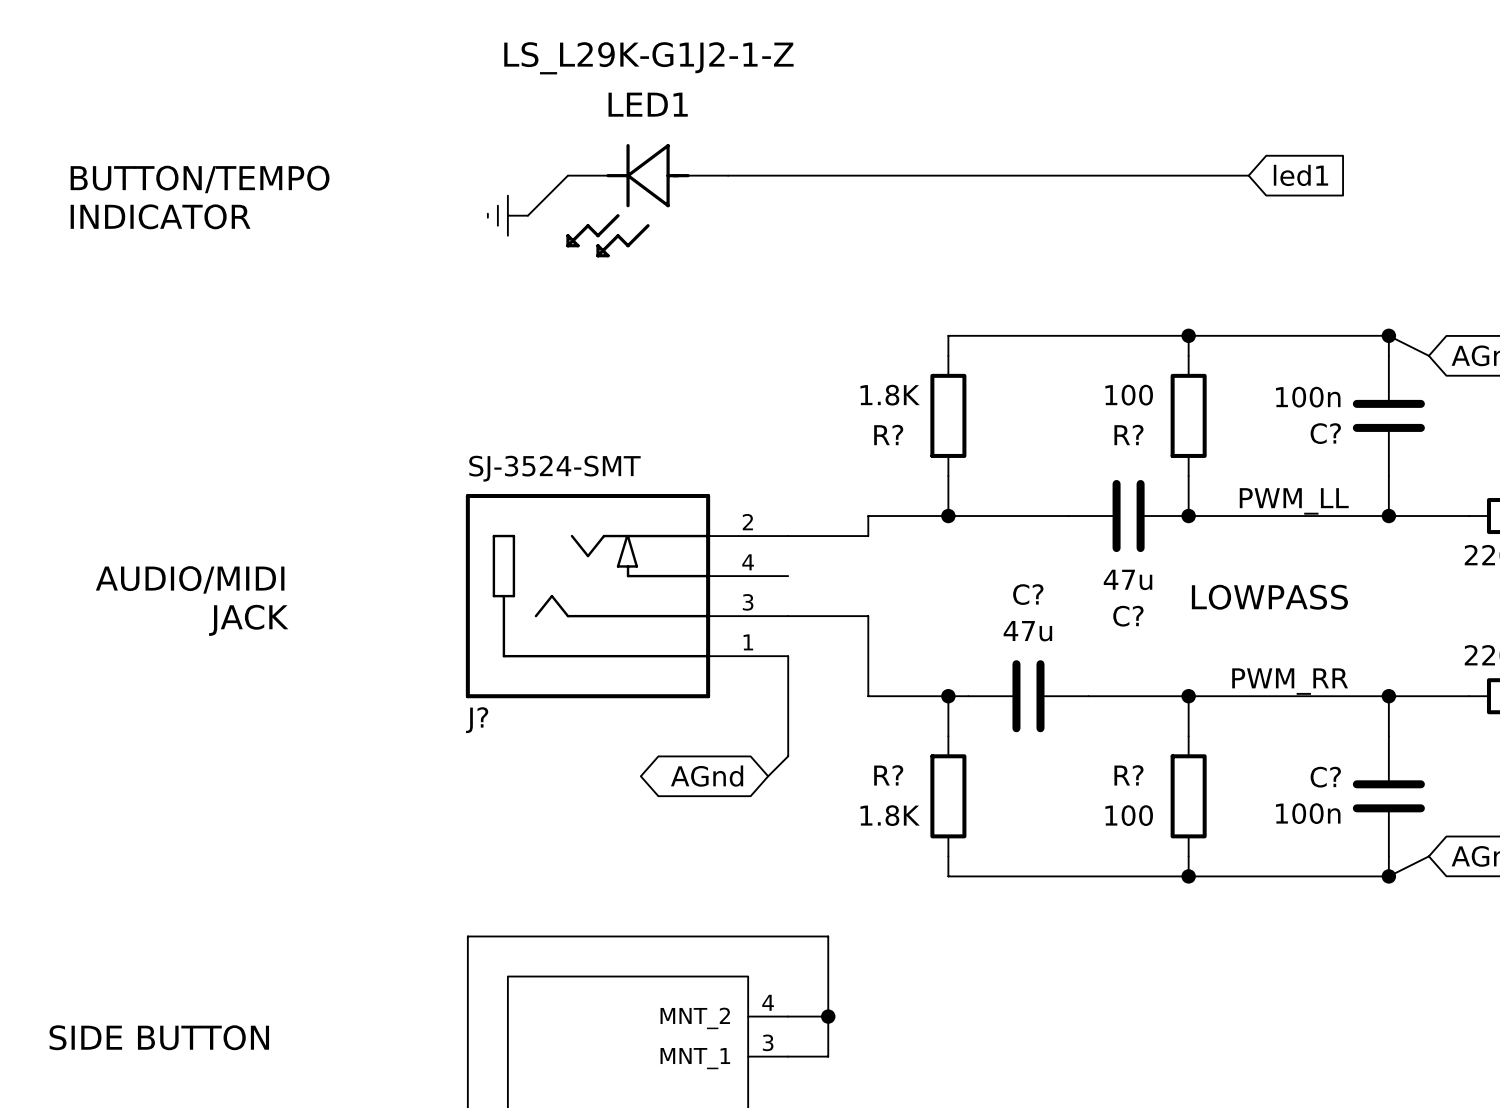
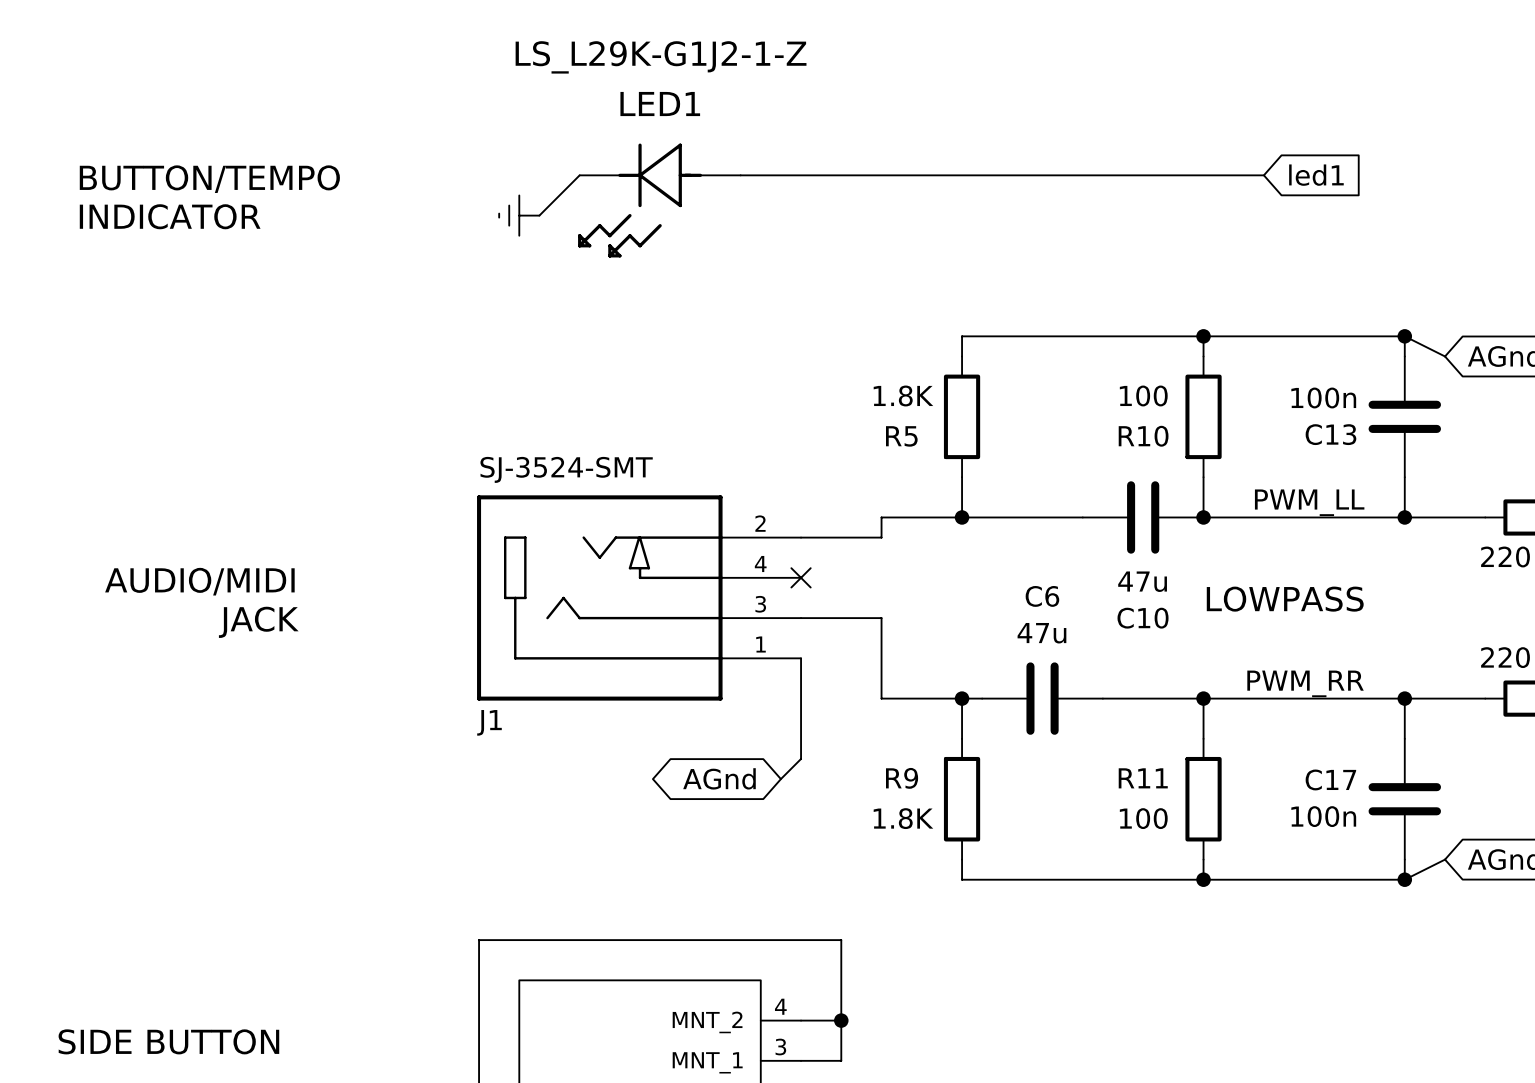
C? name: C? (1325, 433) -> C13 (1330, 434)
R? name: R? (888, 435) -> R5 (901, 436)
R? name: R? (1128, 435) -> R10 (1143, 436)
no-connect mark: none -> (801, 577)
C? name: C? (1028, 594) -> C6 (1042, 596)
C? name: C? (1128, 616) -> C10 (1143, 618)
J? name: J? (477, 720) -> J1 (489, 722)
R? name: R? (888, 775) -> R9 (902, 778)
R? name: R? (1128, 775) -> R11 (1143, 778)
C? name: C? (1325, 777) -> C17 (1330, 779)

